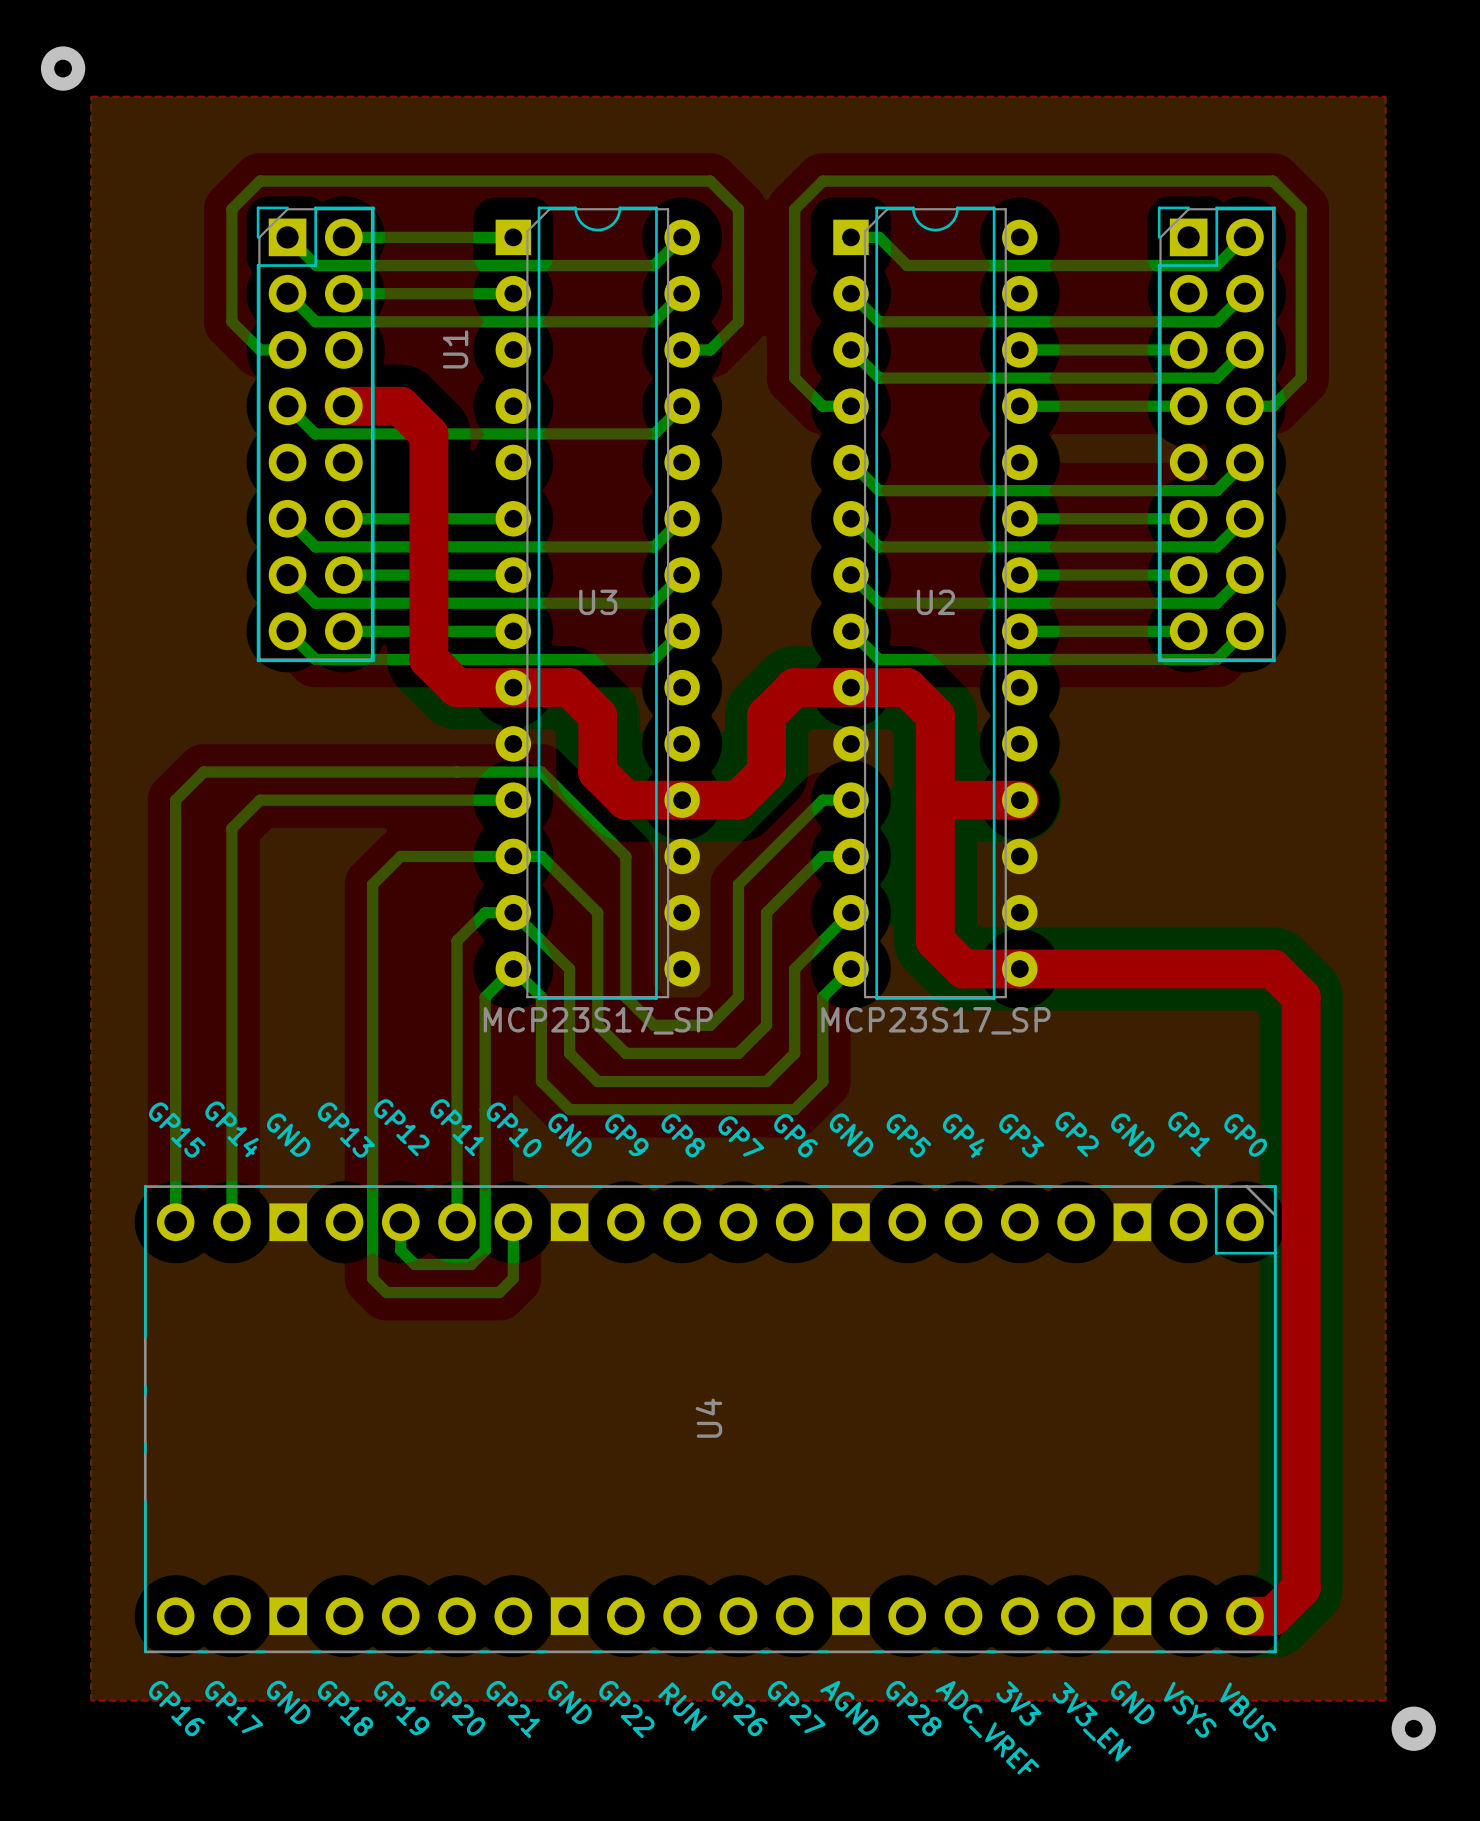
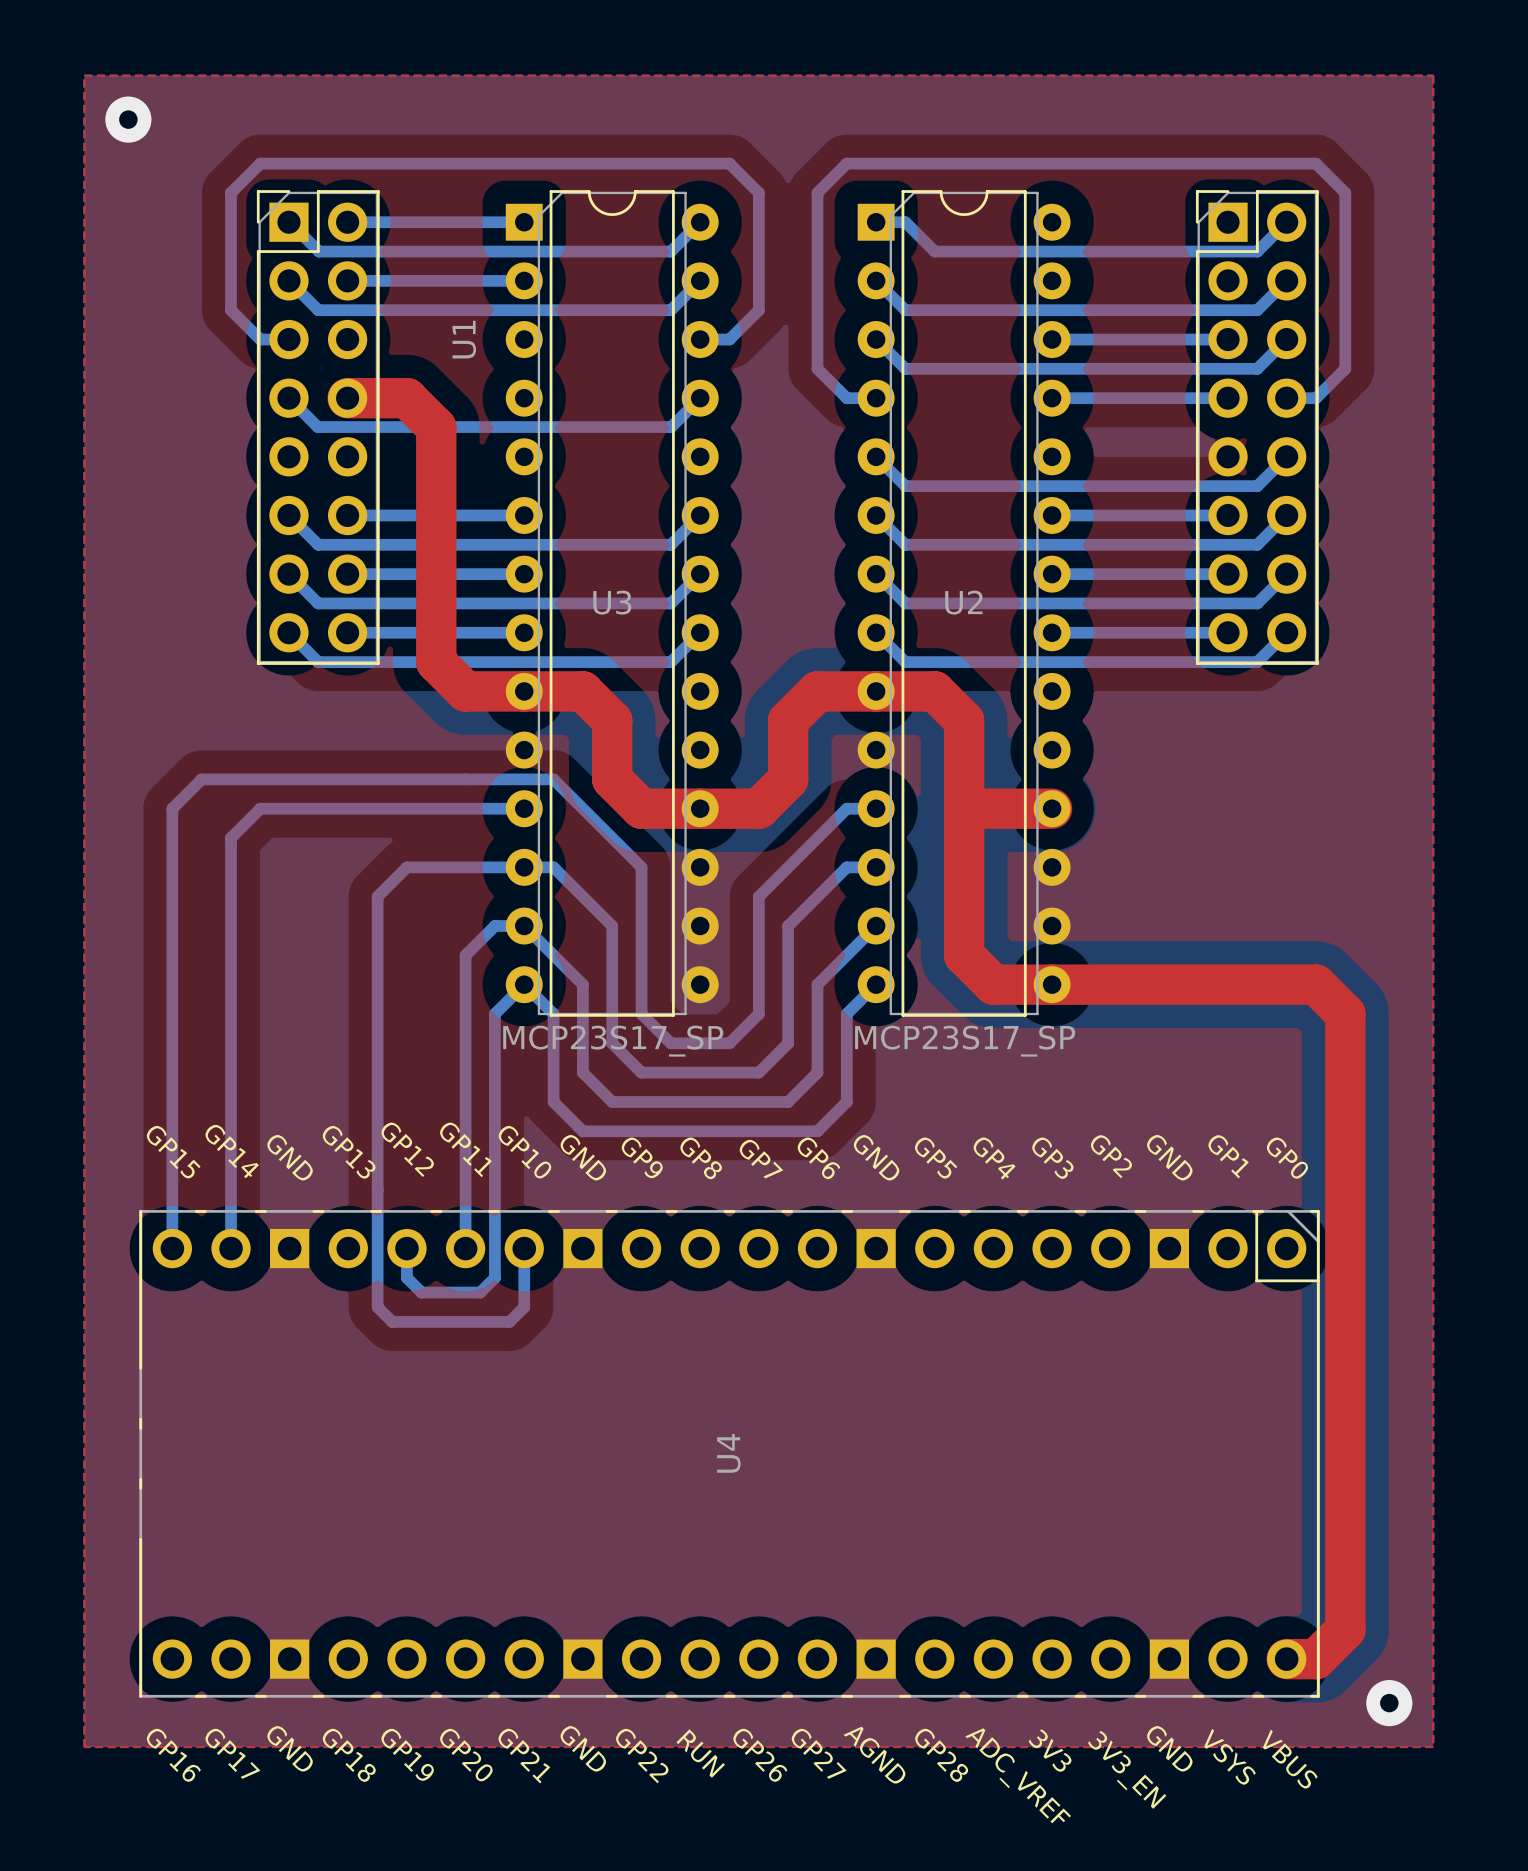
via position: (63, 68) -> (128, 119)
via position: (1413, 1728) -> (1389, 1703)

